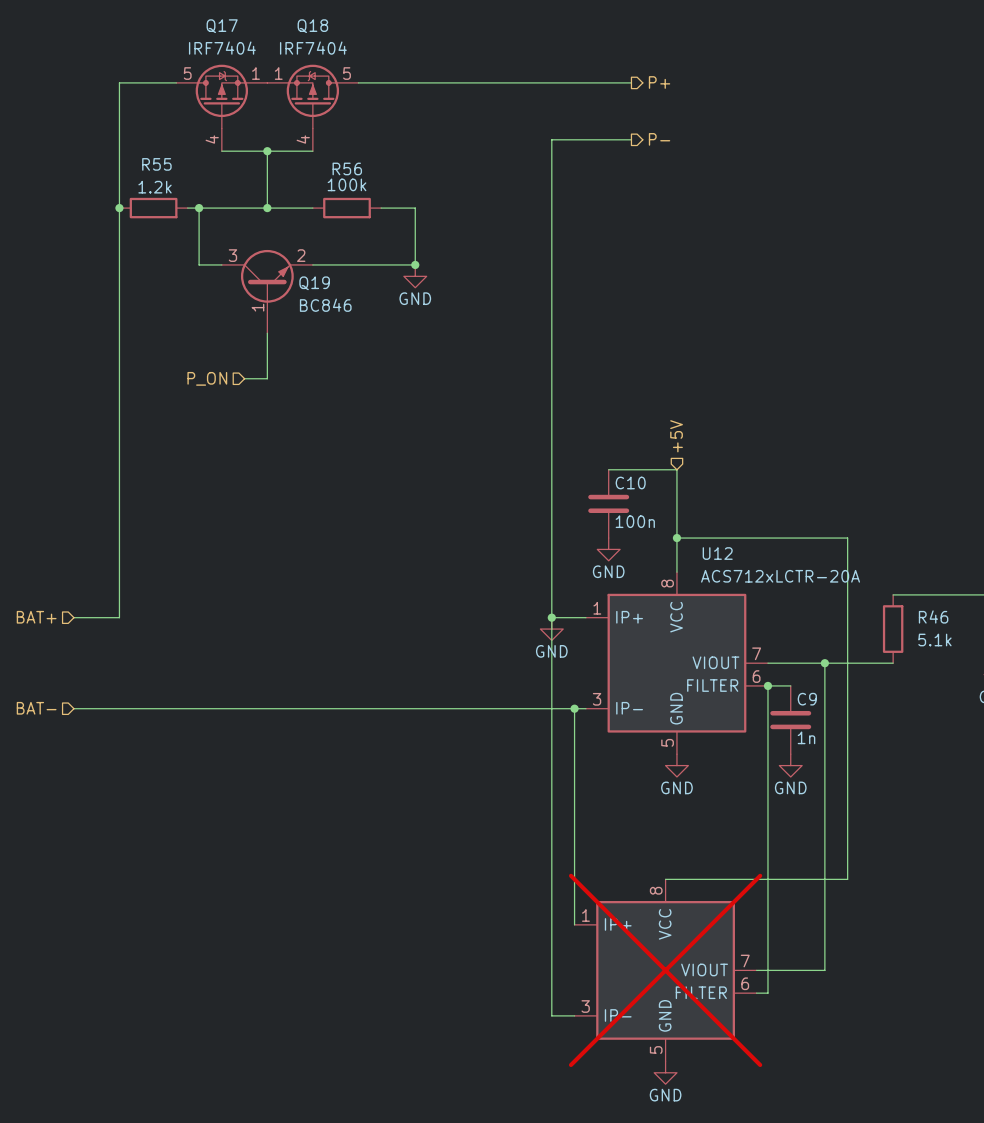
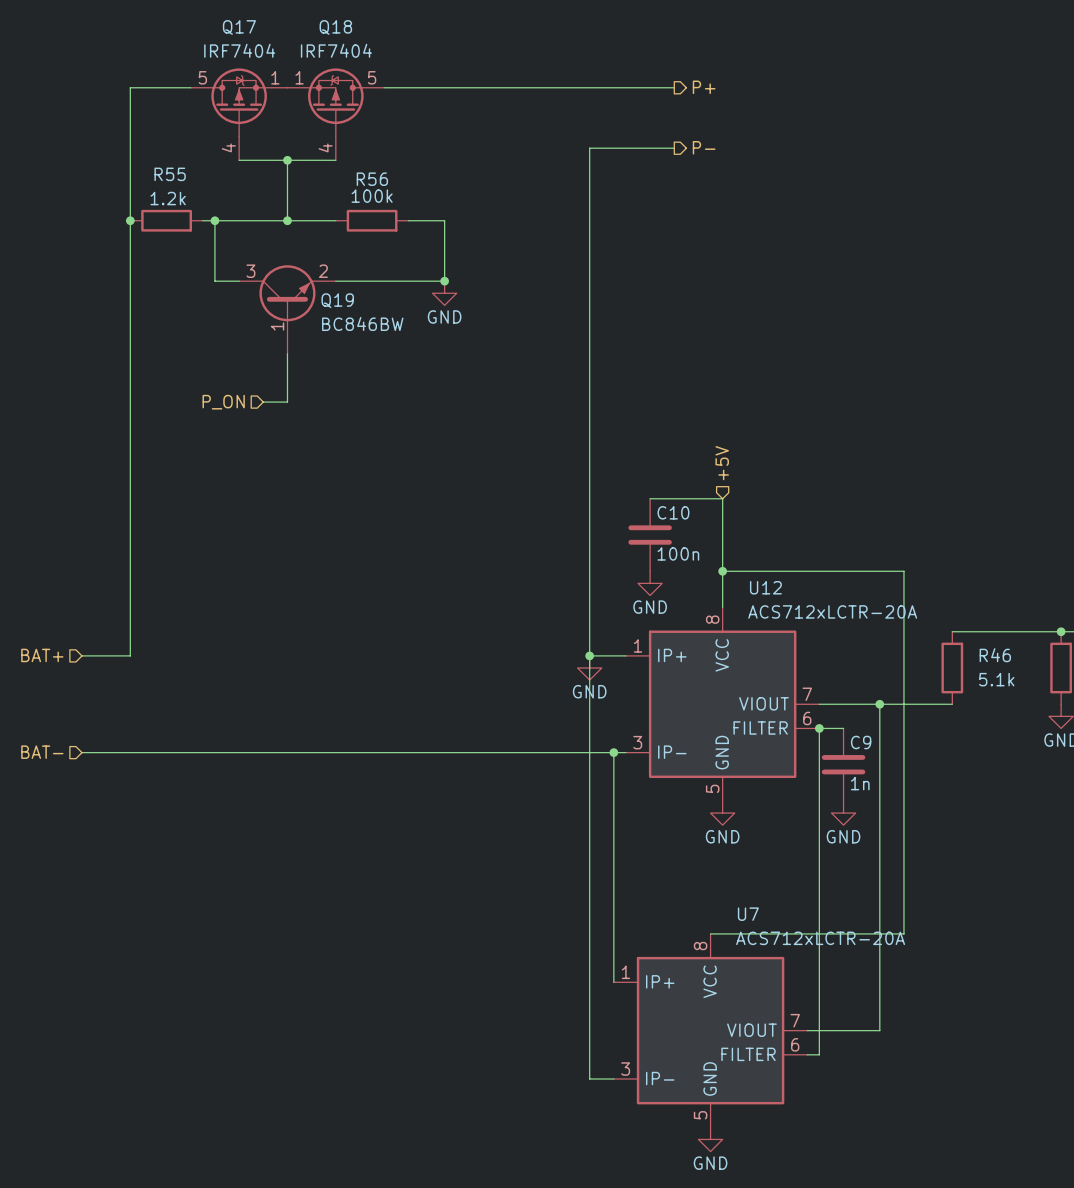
Q19 value: BC846 (325, 305) -> BC846BW (362, 323)
U7 name: none -> U7 (748, 914)
U7 value: none -> ACS712xLCTR-20A (820, 938)
U7 do-not-place cross: (665, 970) -> none

